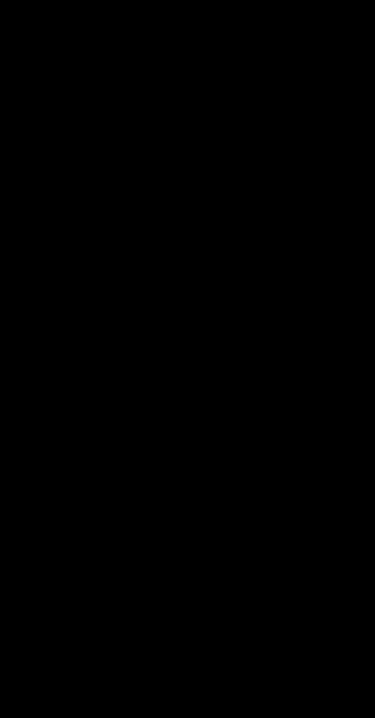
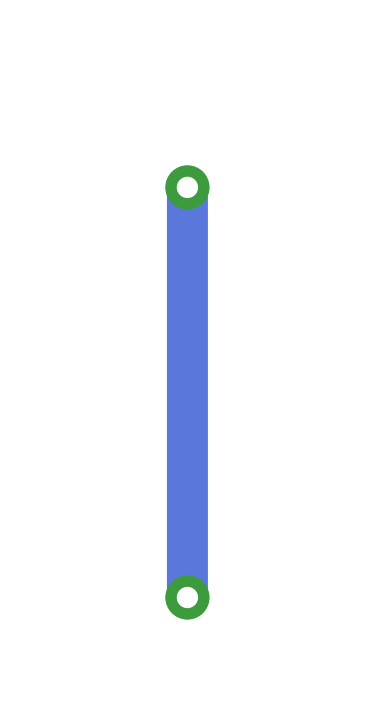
track: none -> (187, 187) (187, 597)
via: none -> (187, 187)
via: none -> (187, 597)

